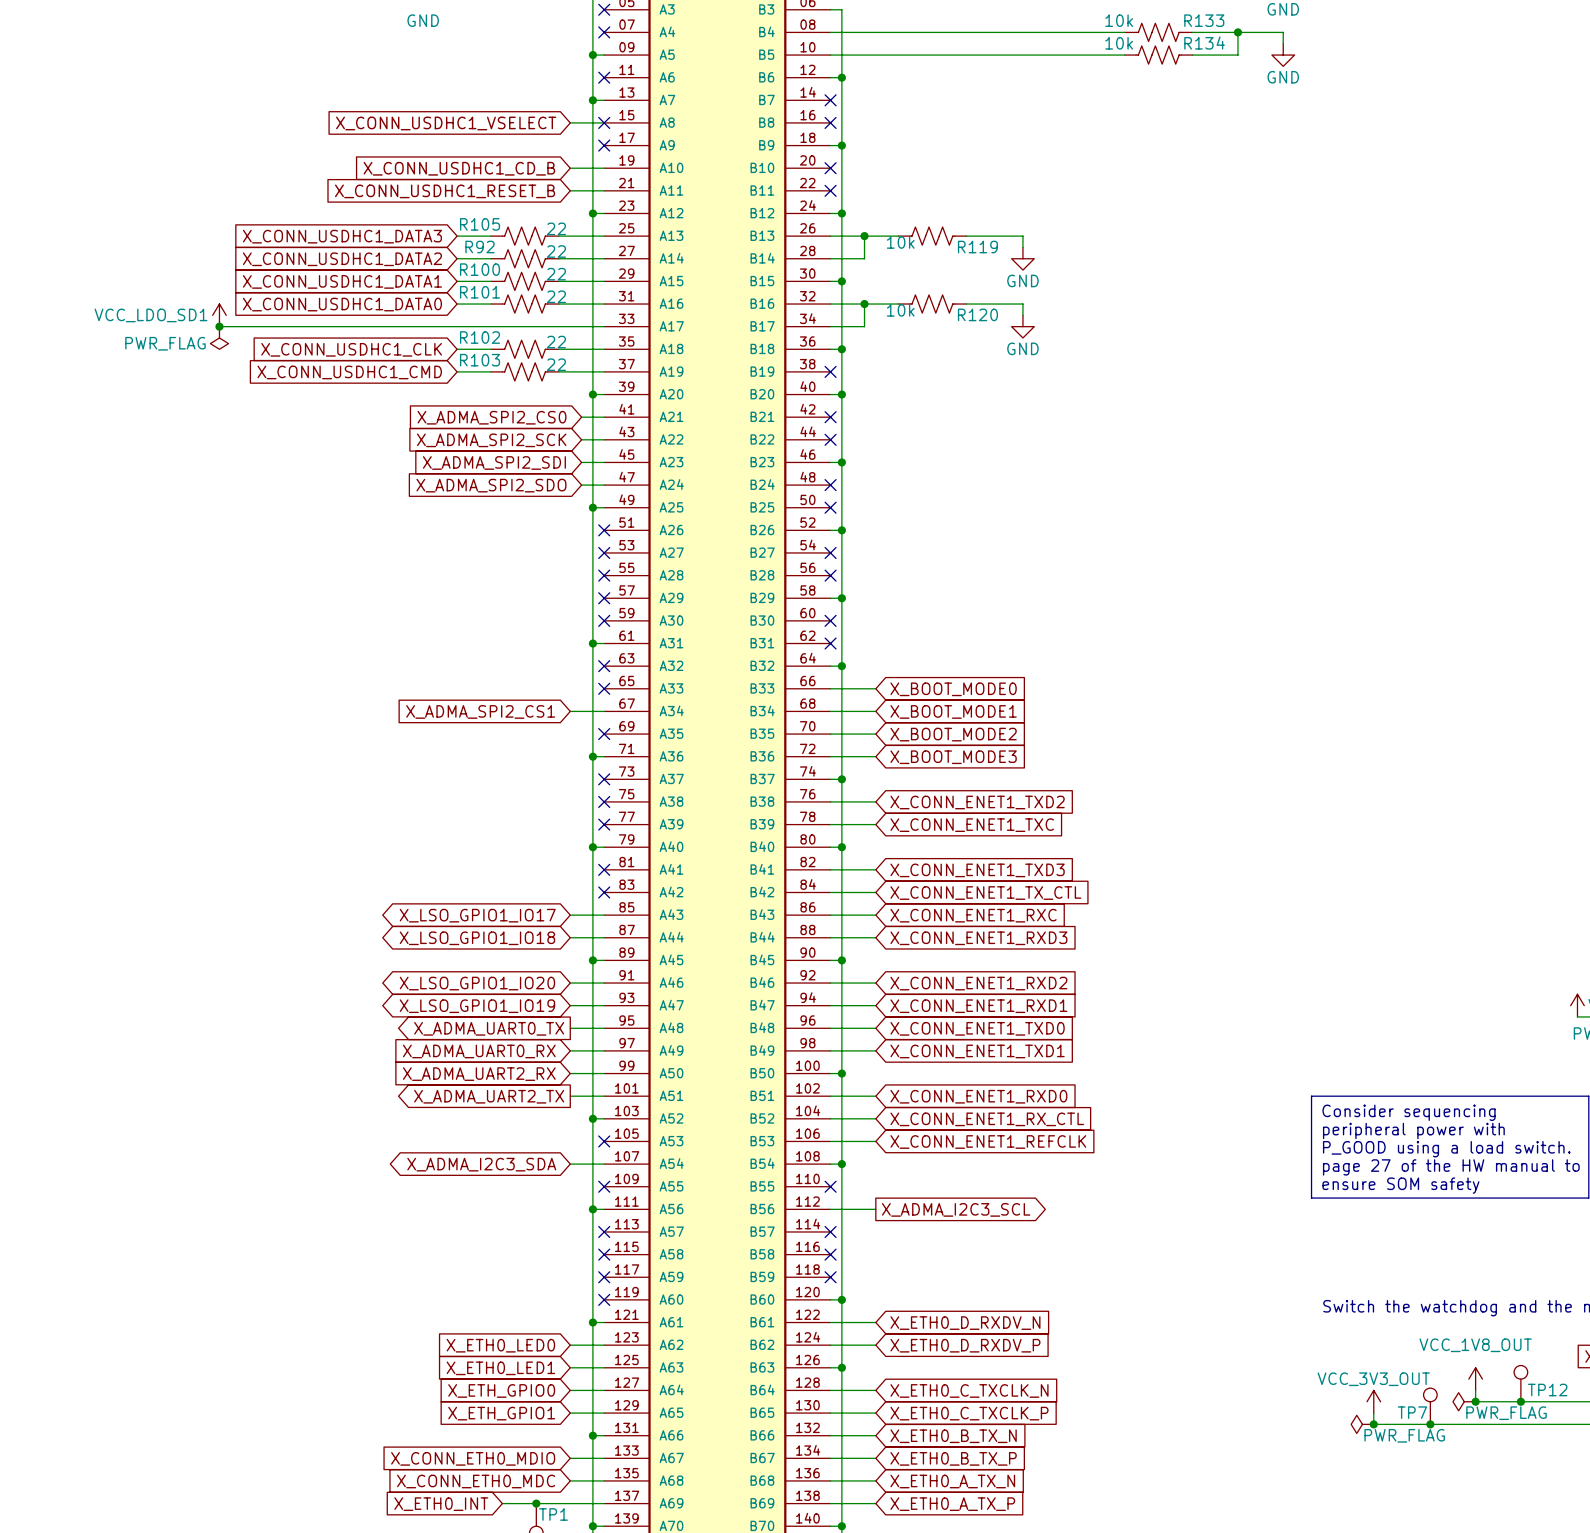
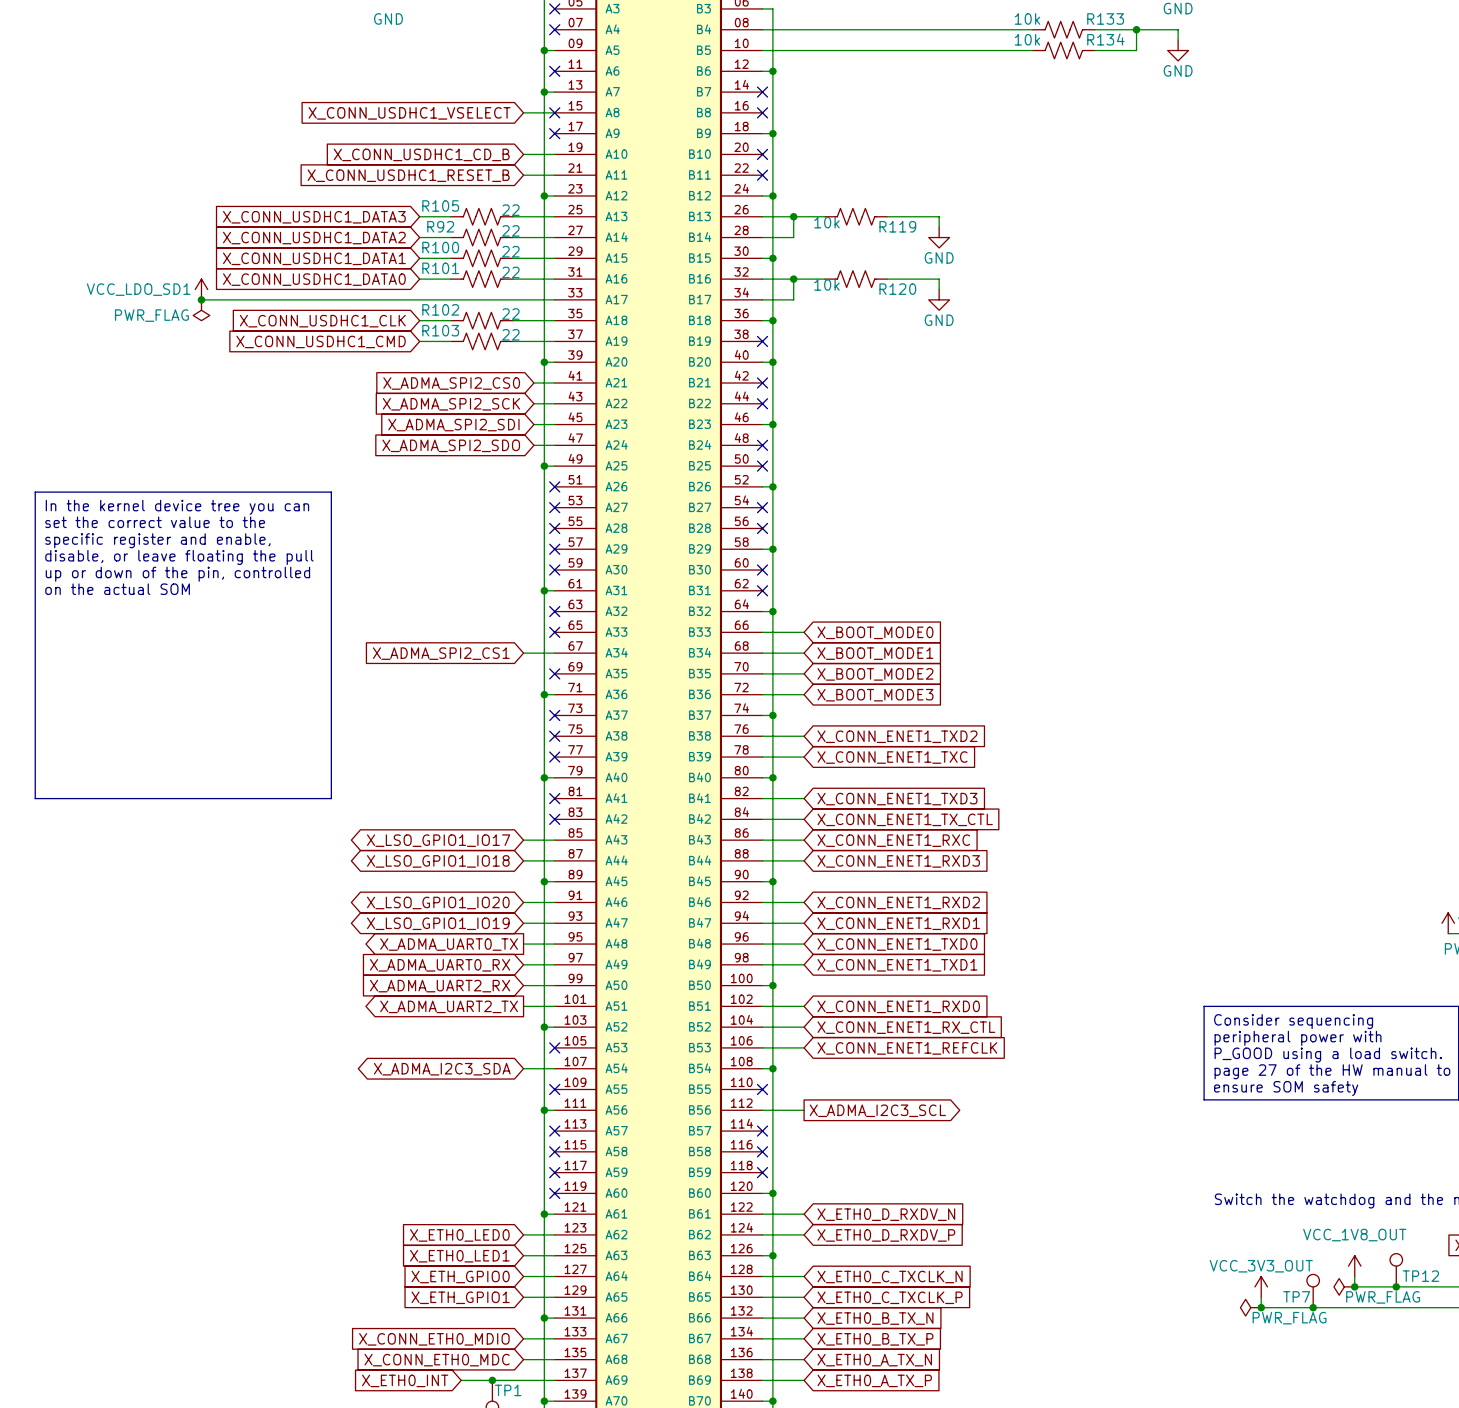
line: none -> (35, 492) (331, 492) (331, 798) (35, 798) (35, 492)
text: none -> In the kernel device tree you can (177, 507)
text: none -> set the correct value to the (155, 522)
text: none -> specific register and enable, (157, 540)
text: none -> disable, or leave floating the pull (179, 557)
text: none -> up or down of the pin, controlled (177, 574)
text: none -> on the actual SOM (117, 589)

